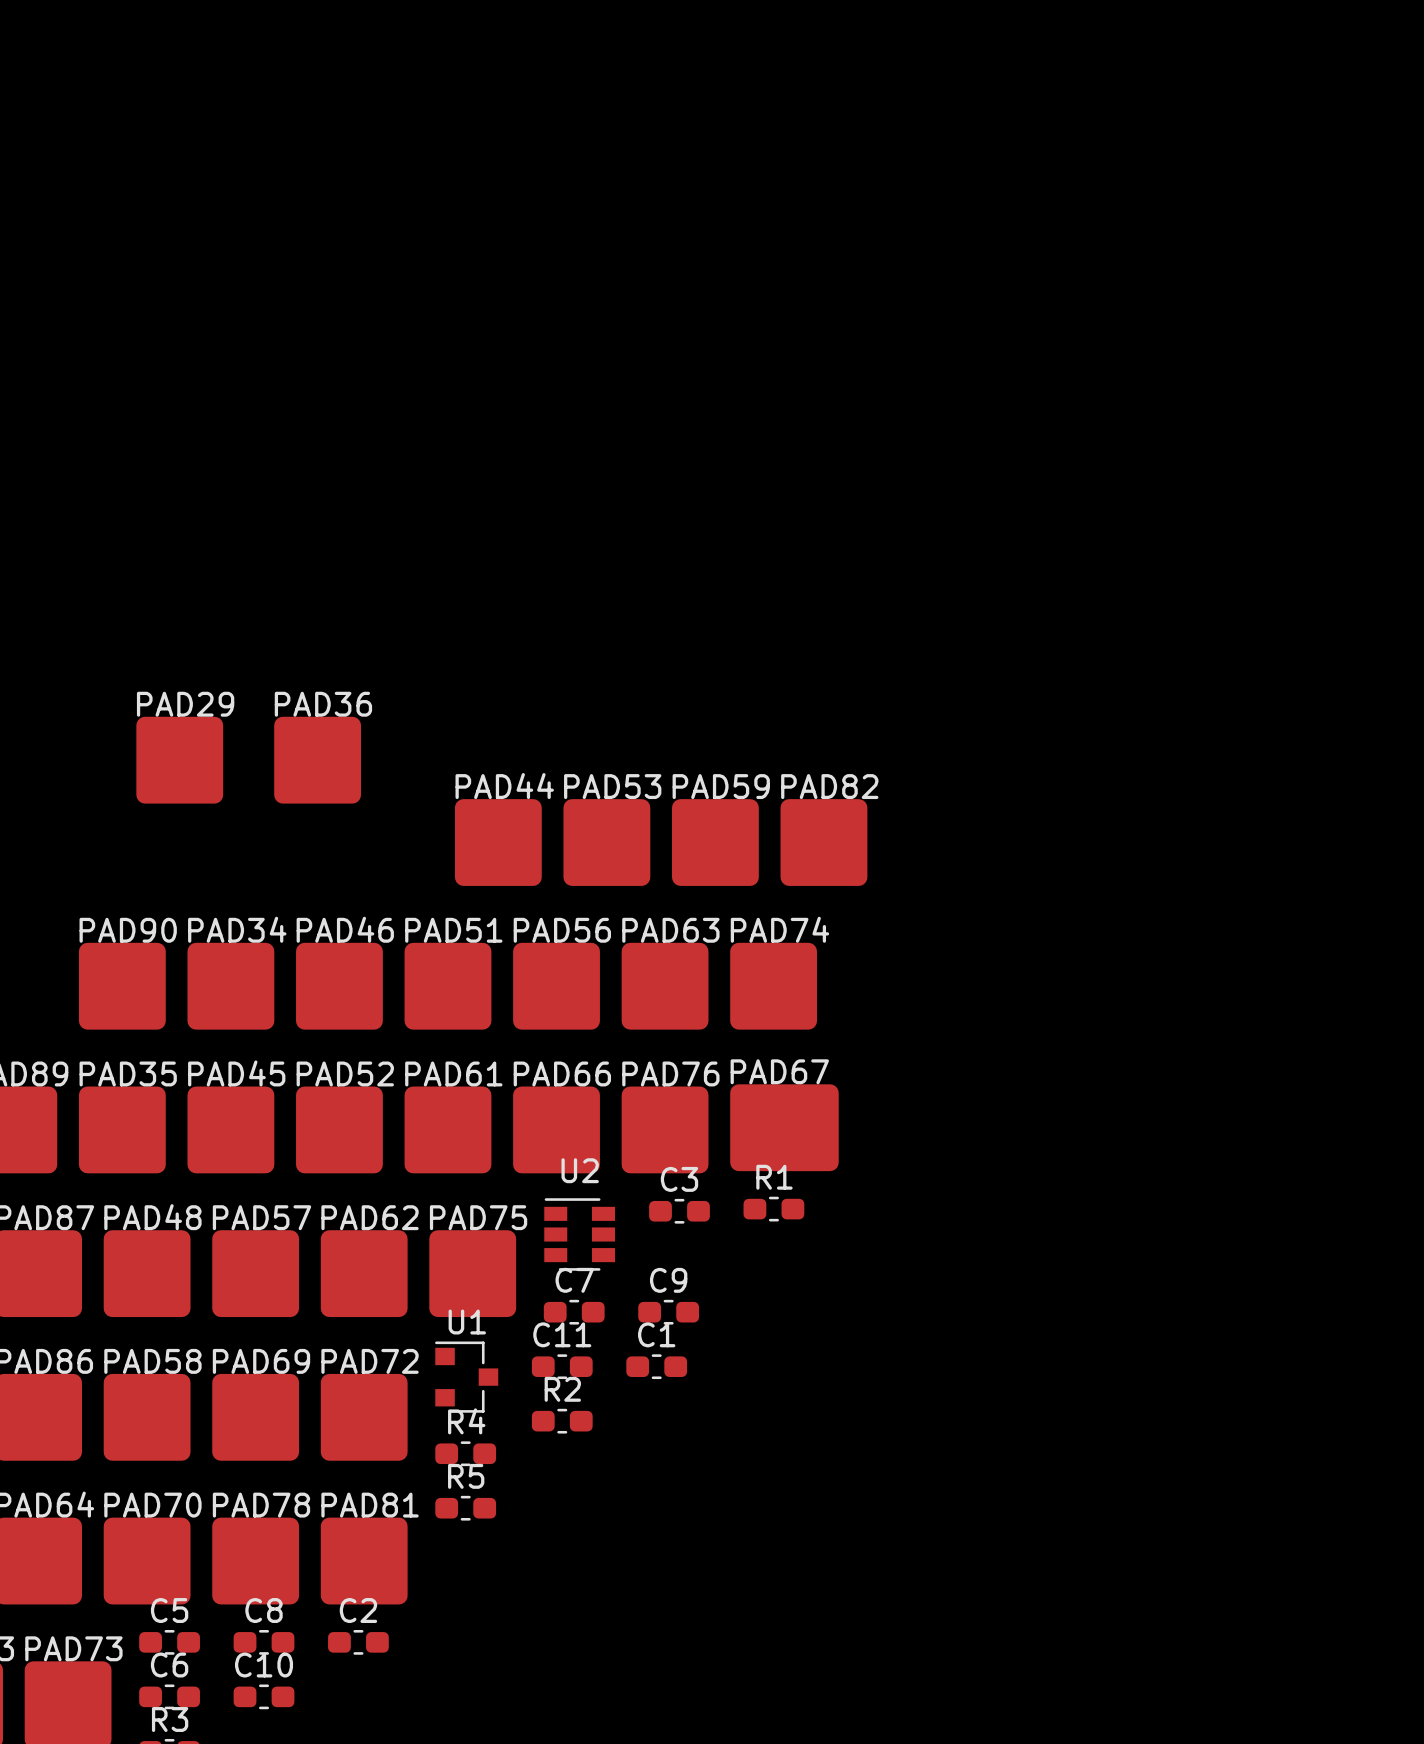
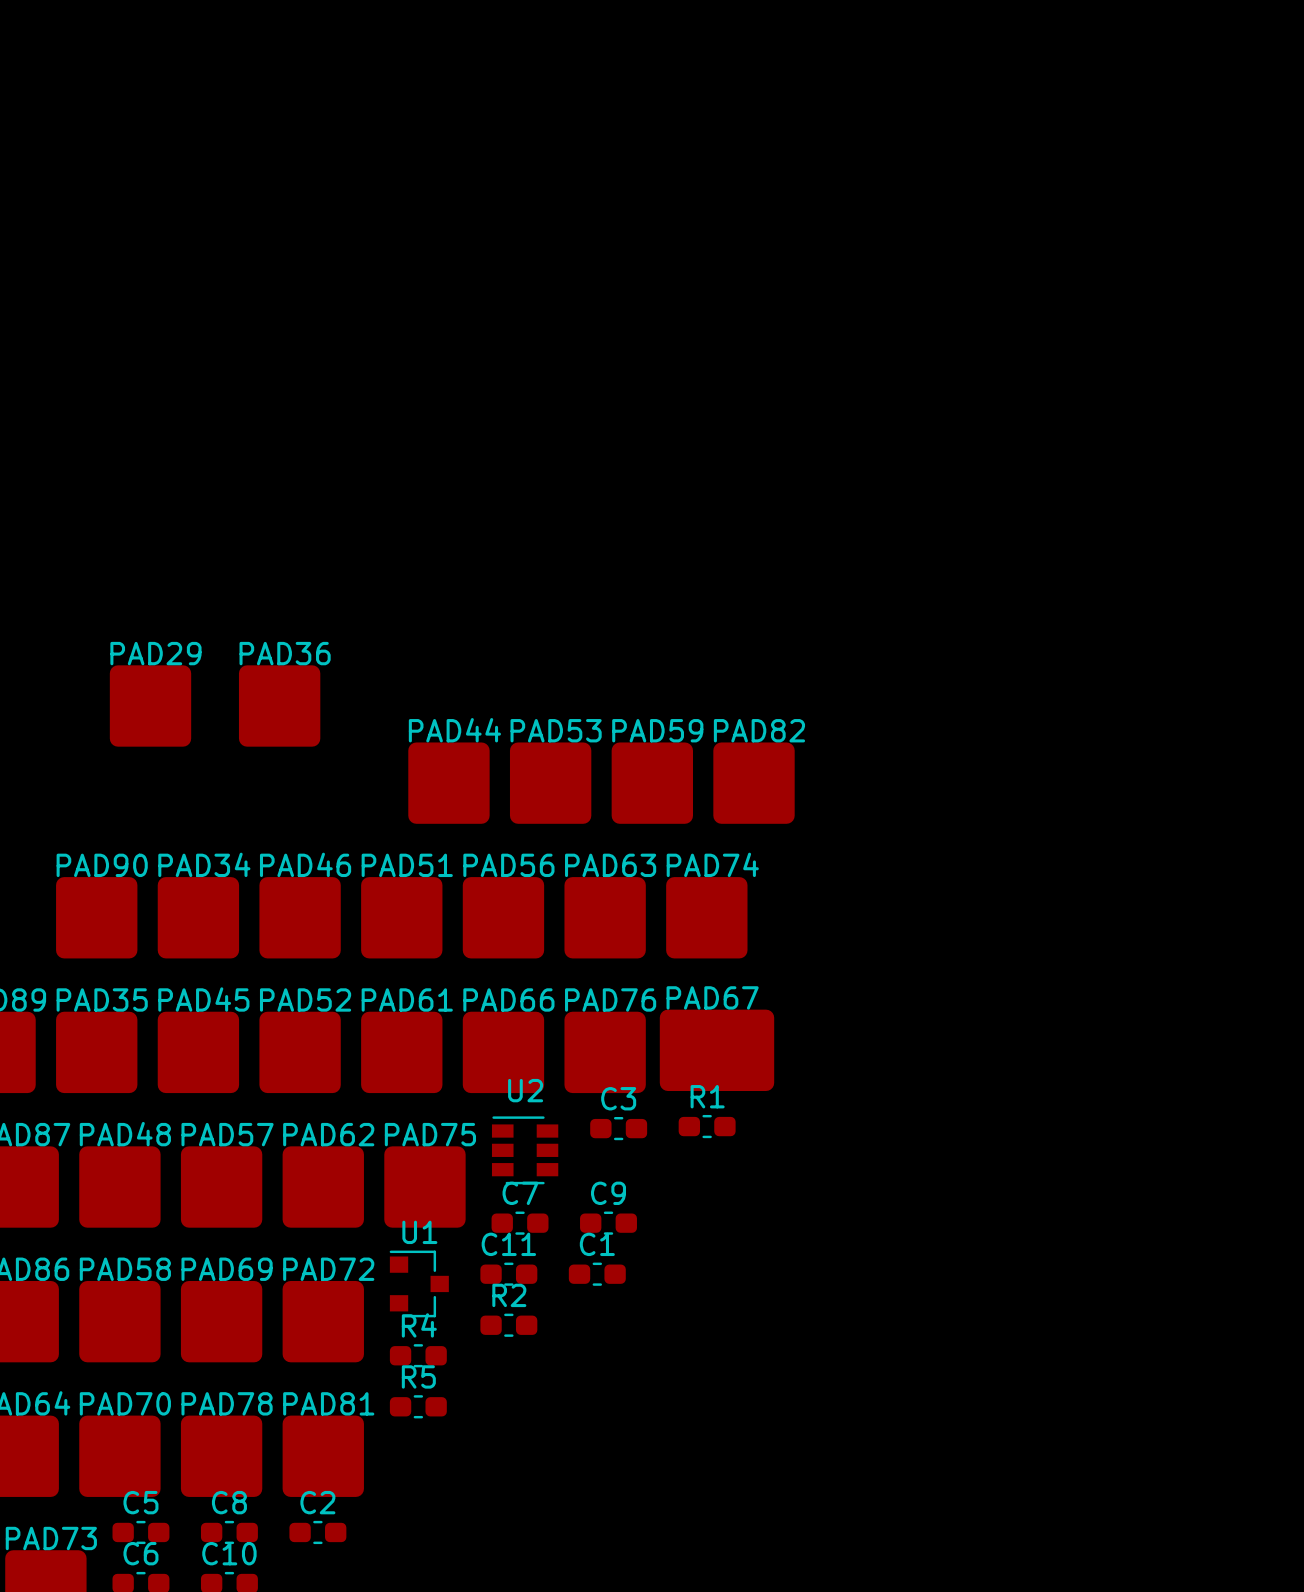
PAD67 footprint: [730, 1084, 839, 1172] -> [659, 1009, 775, 1092]

